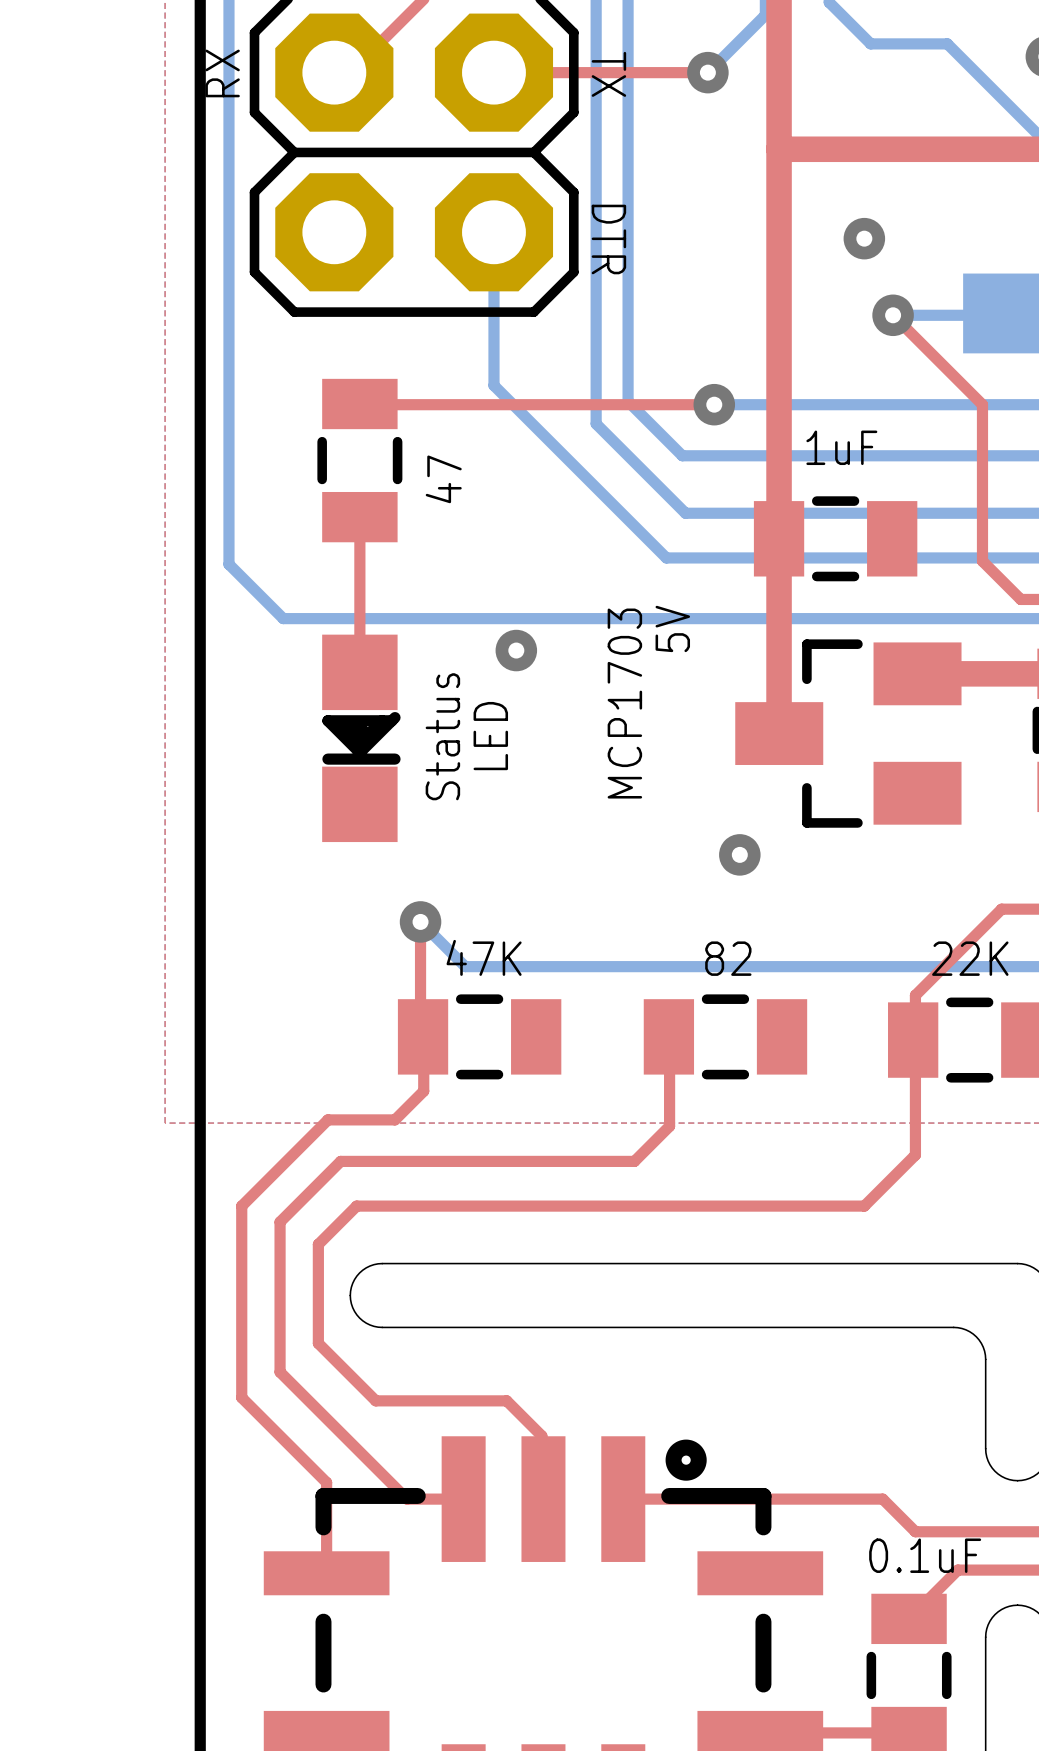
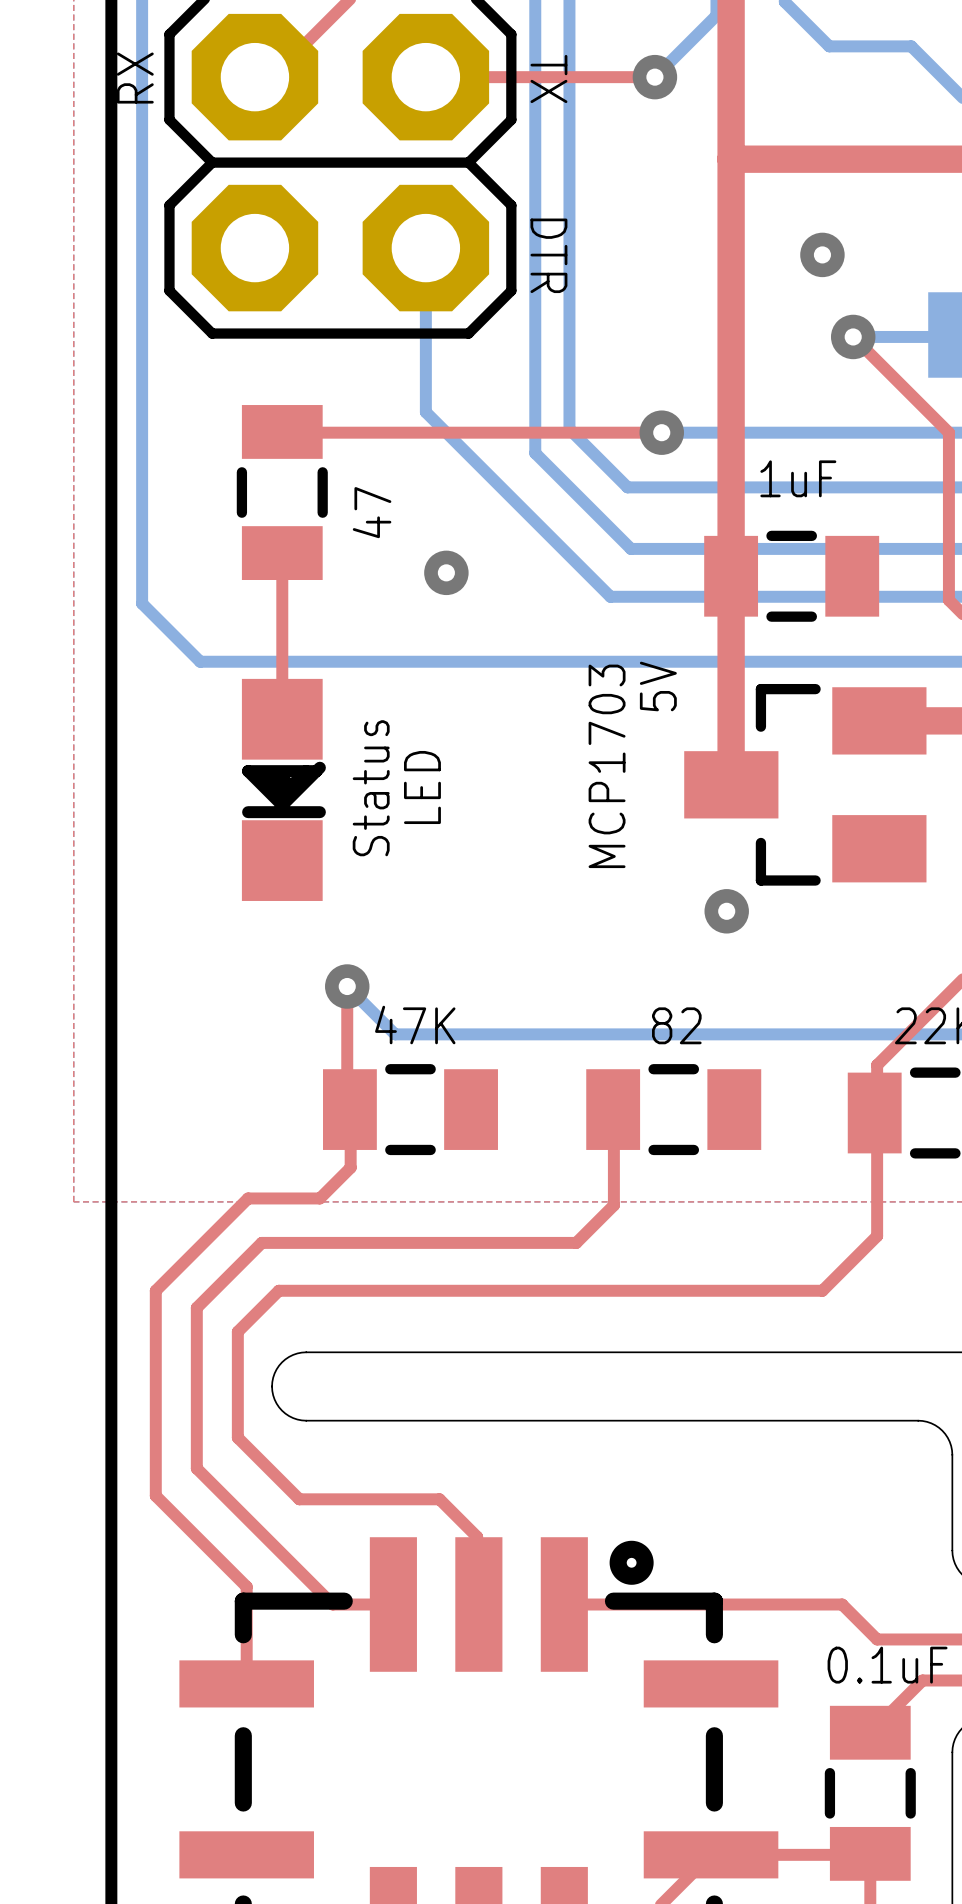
text position: 5V (672, 628) -> 5V (658, 686)
via position: (516, 650) -> (446, 572)
text position: MCP1703 (624, 703) -> MCP1703 (607, 766)
via position: (739, 854) -> (726, 911)

